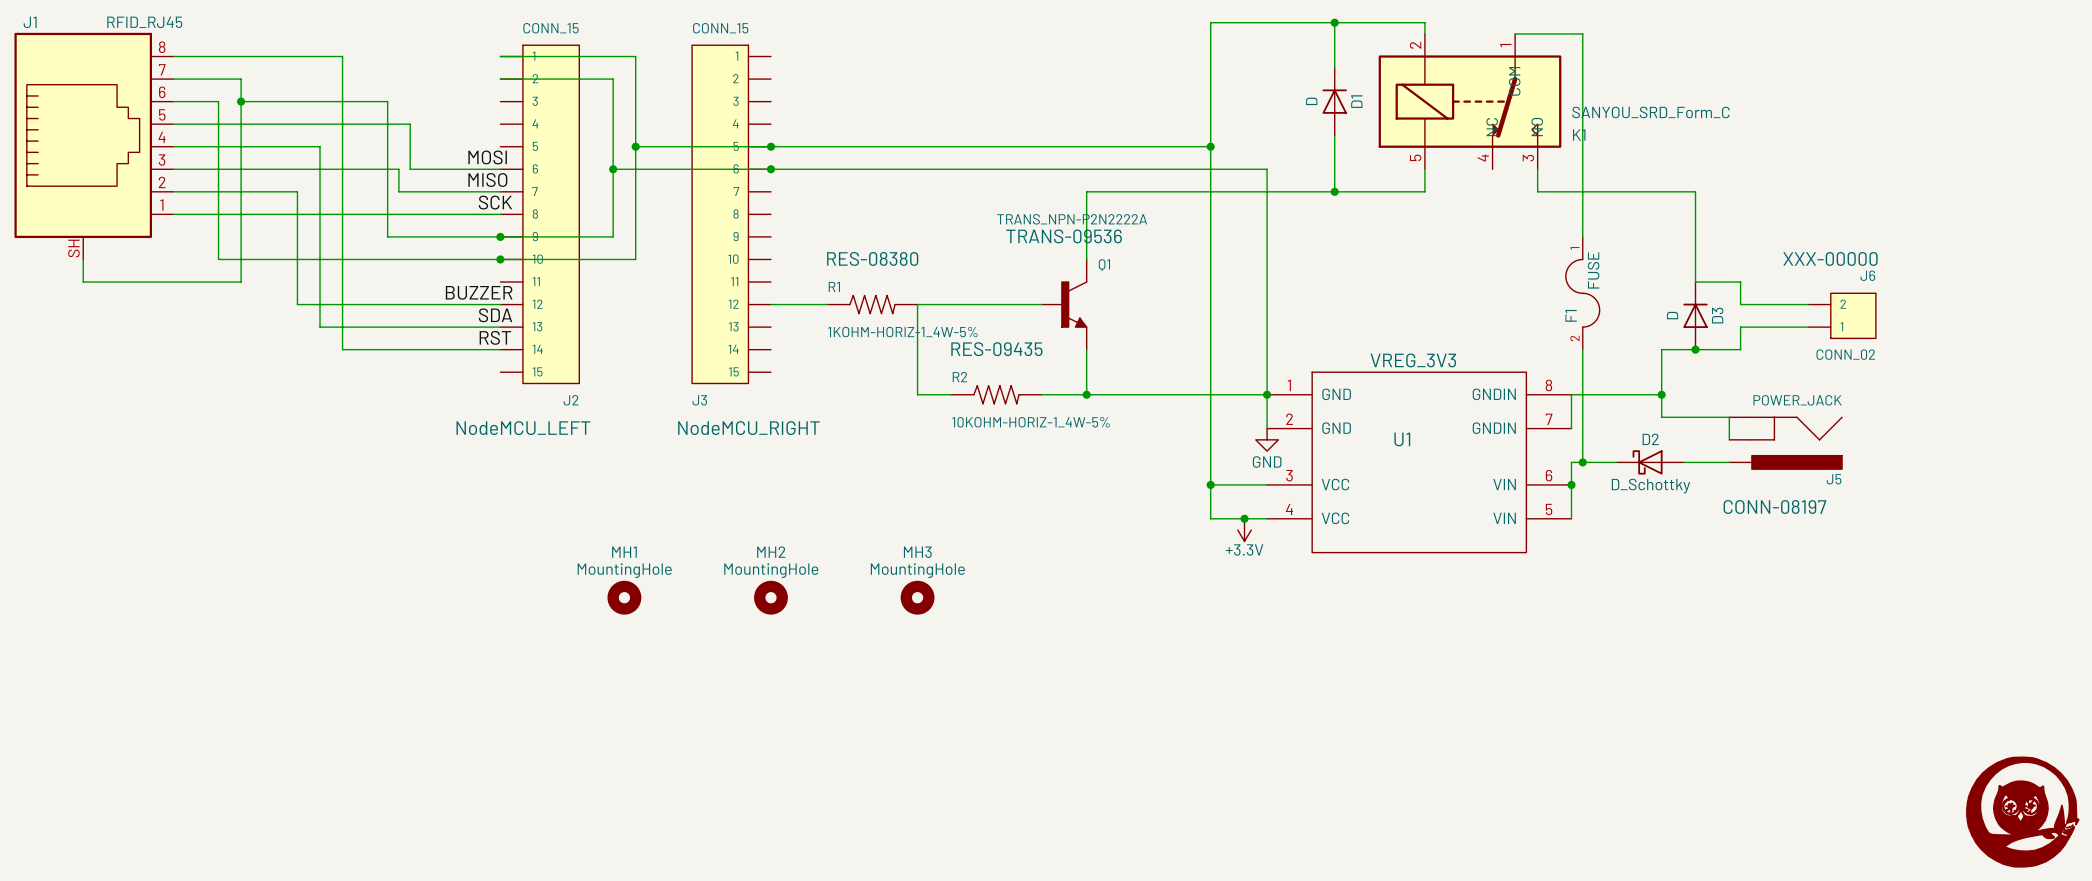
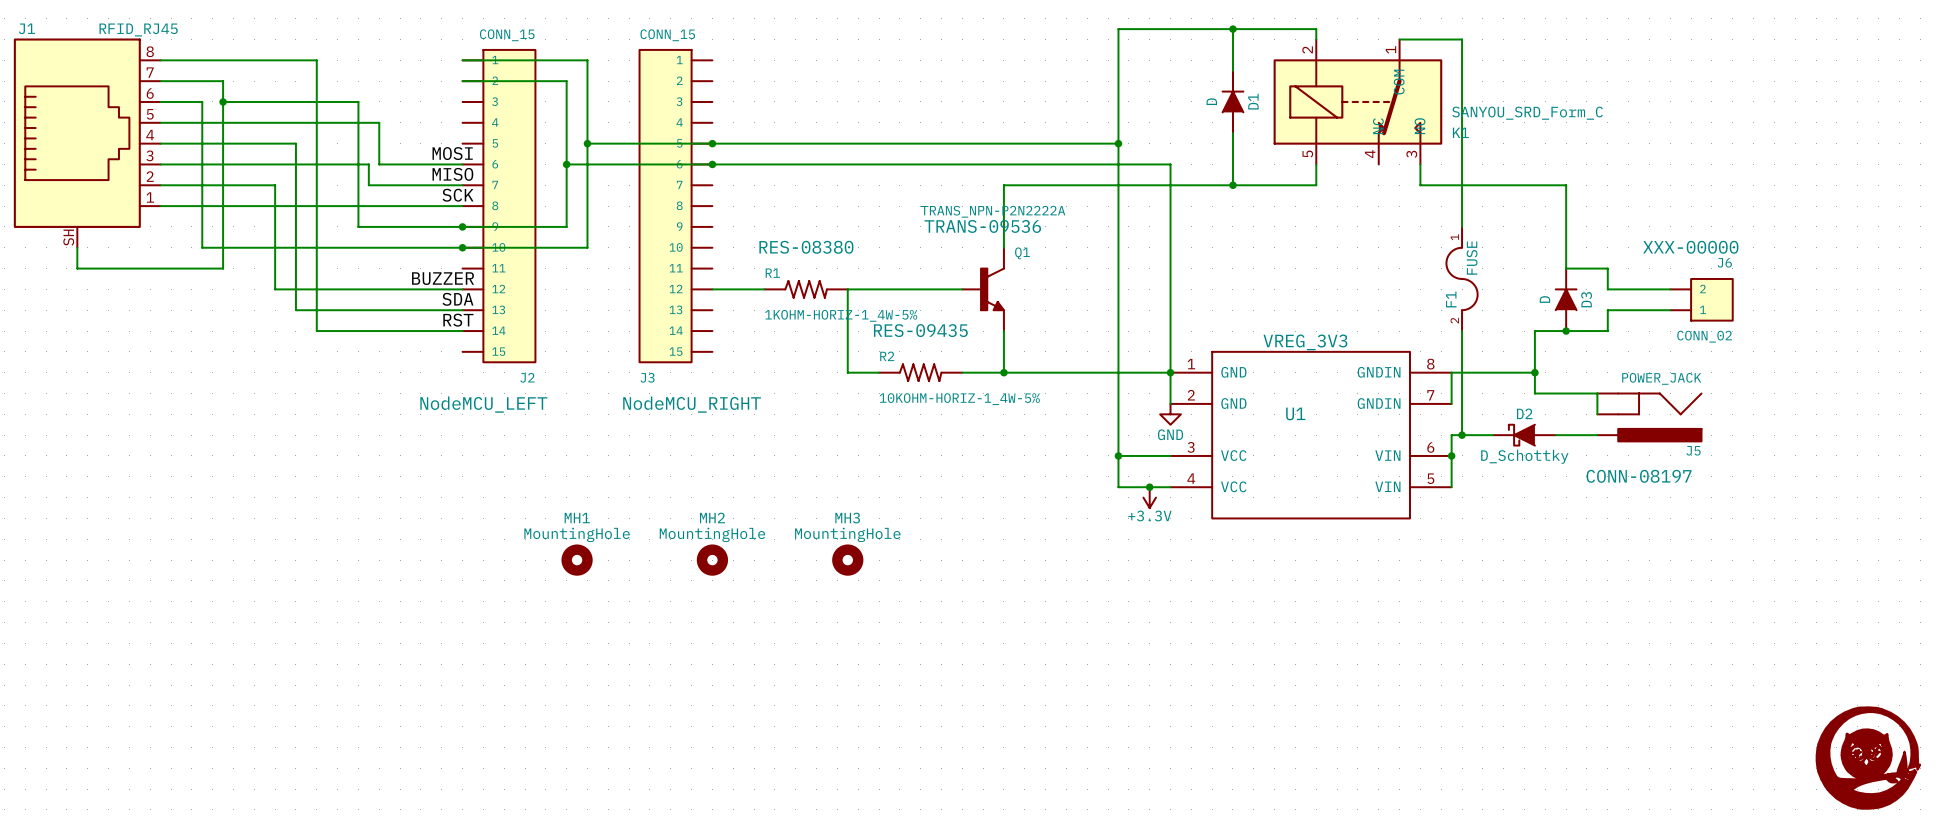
D1 symbol: [1322, 67, 1347, 136] -> [1221, 70, 1245, 134]
D3 symbol: [1683, 282, 1708, 350] -> [1555, 268, 1578, 332]
D2 symbol: [1616, 450, 1685, 475] -> [1493, 423, 1556, 447]

